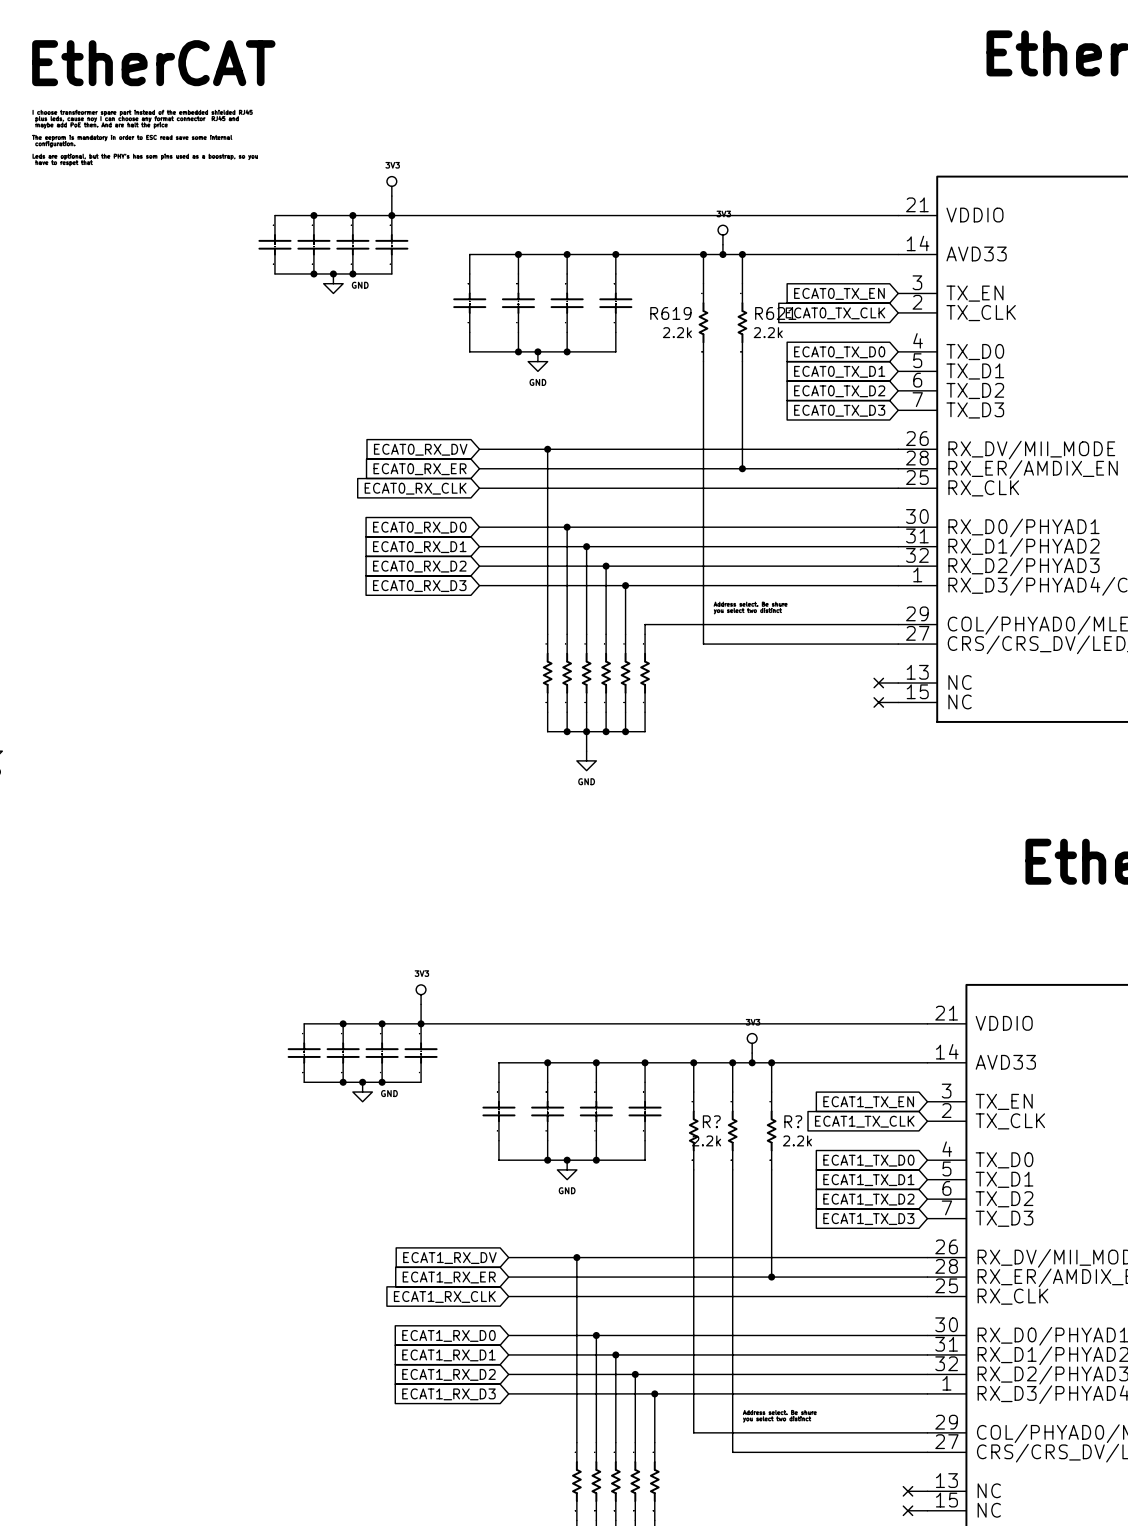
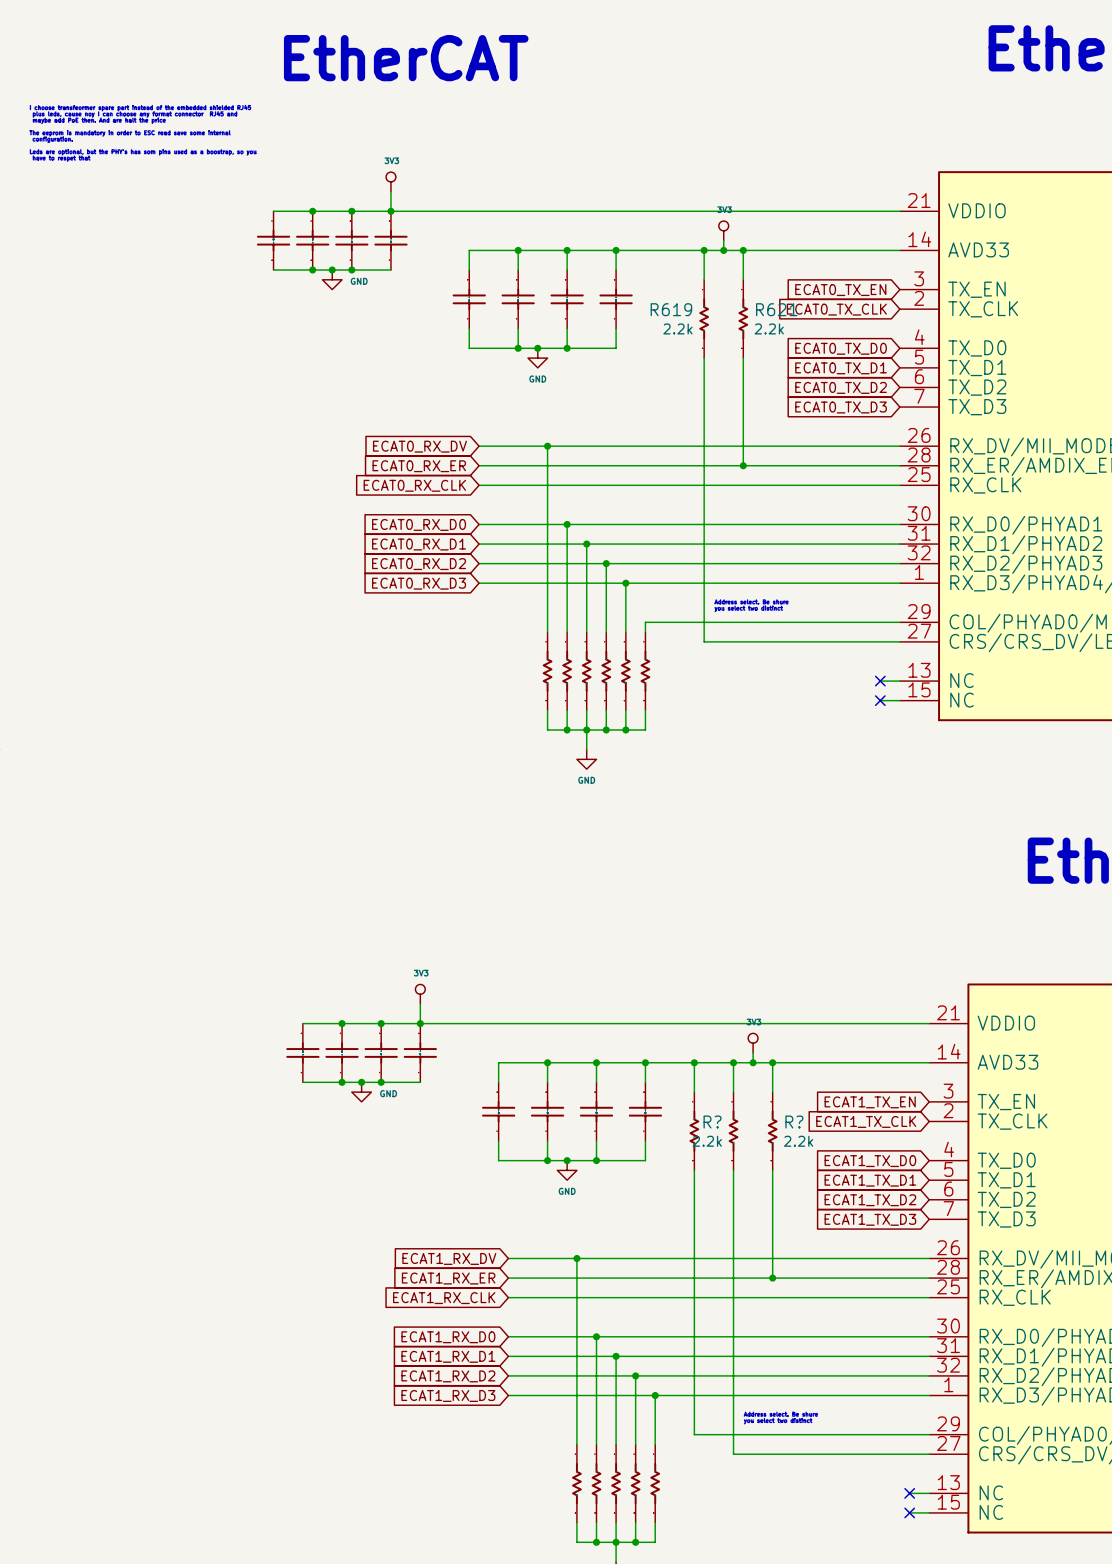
text: EtherCAT (153, 63) -> none
text: none -> EtherCAT (406, 58)

